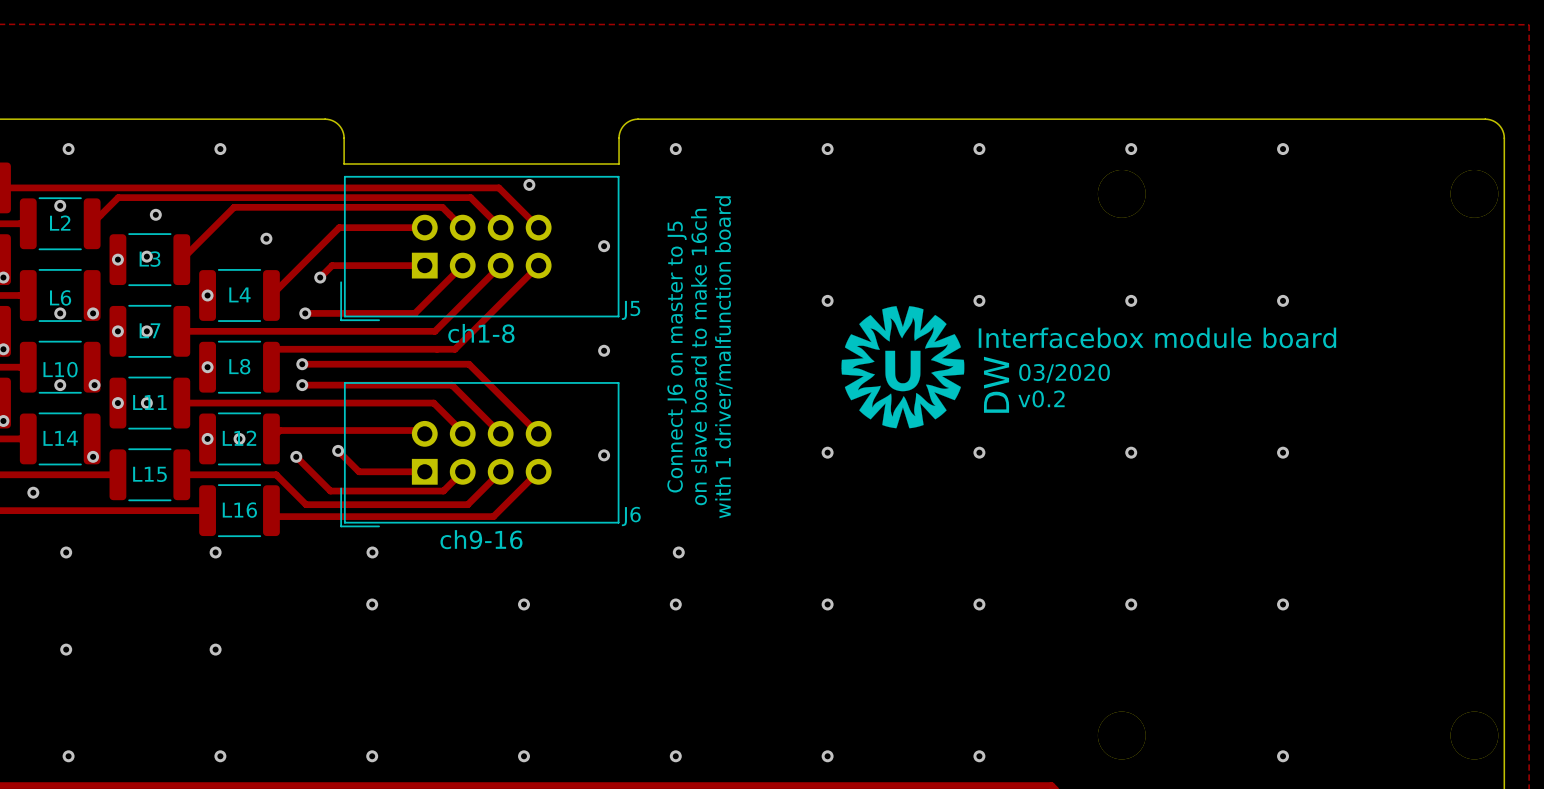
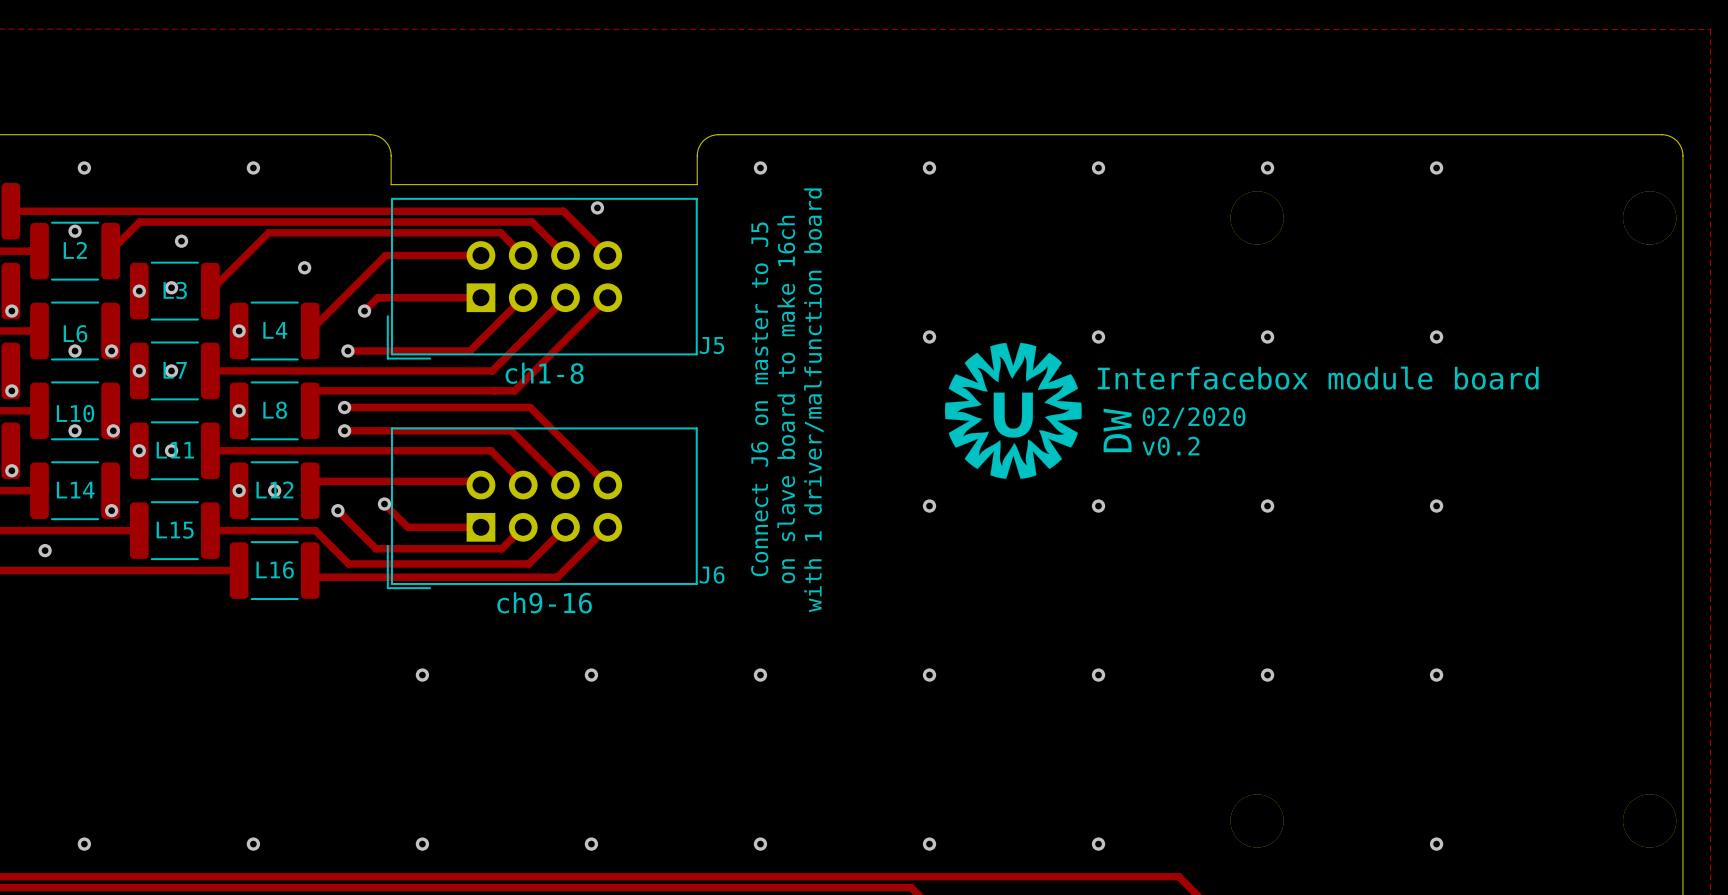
via: (604, 246) -> none
via: (604, 350) -> none
text: 03/2020 (1064, 373) -> 02/2020 (1194, 417)
via: (604, 455) -> none
via: (66, 552) -> none
via: (215, 552) -> none
via: (372, 552) -> none
via: (678, 552) -> none
via: (66, 649) -> none
via: (215, 649) -> none

